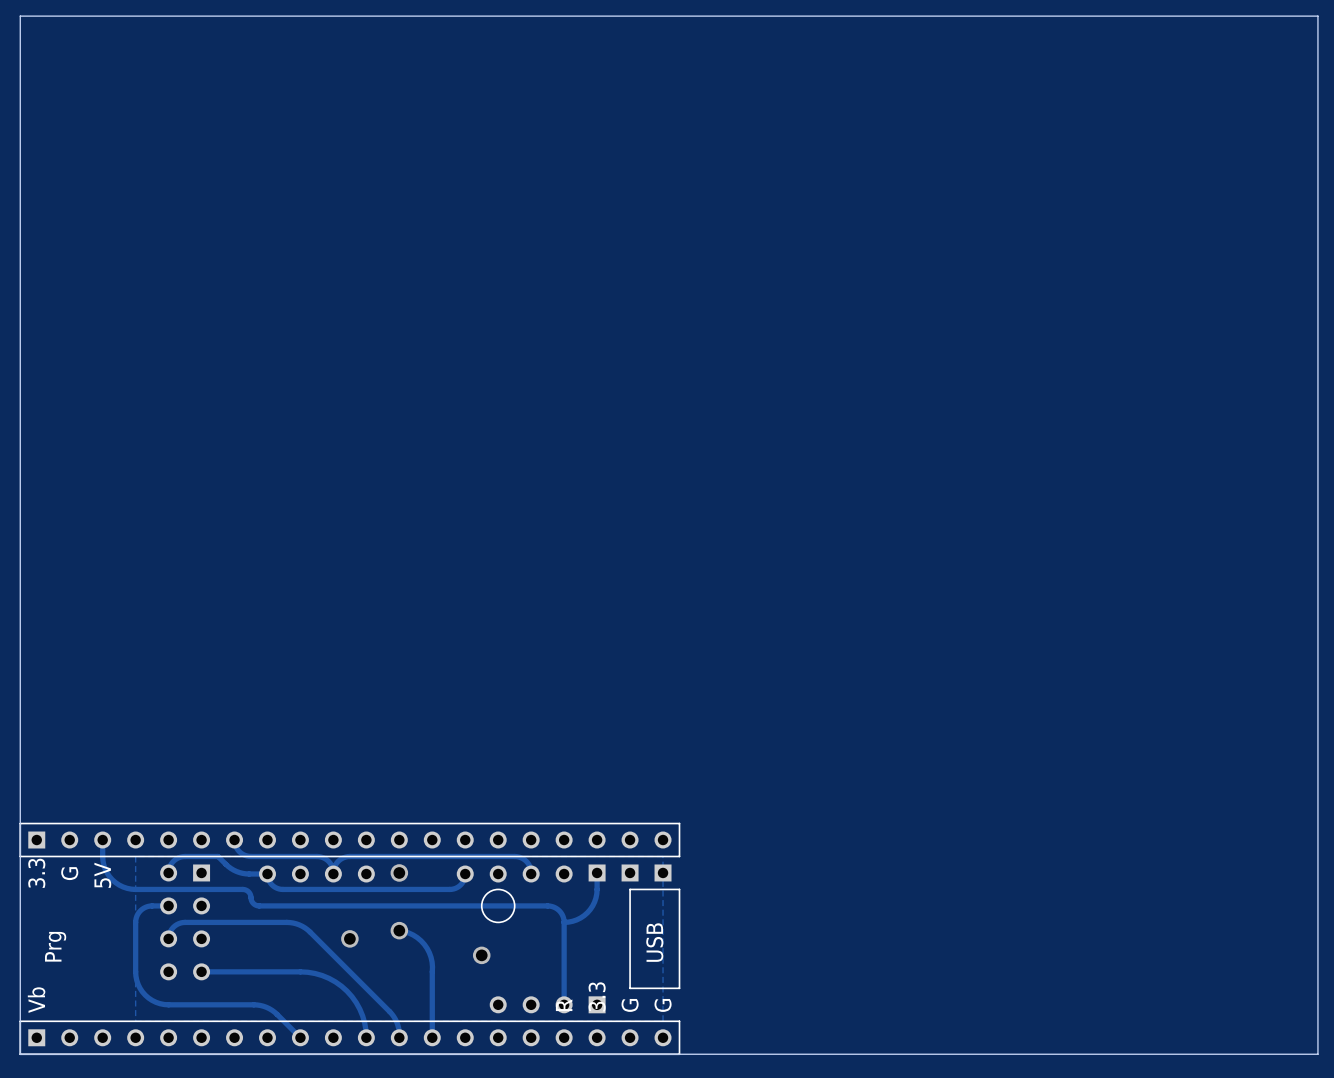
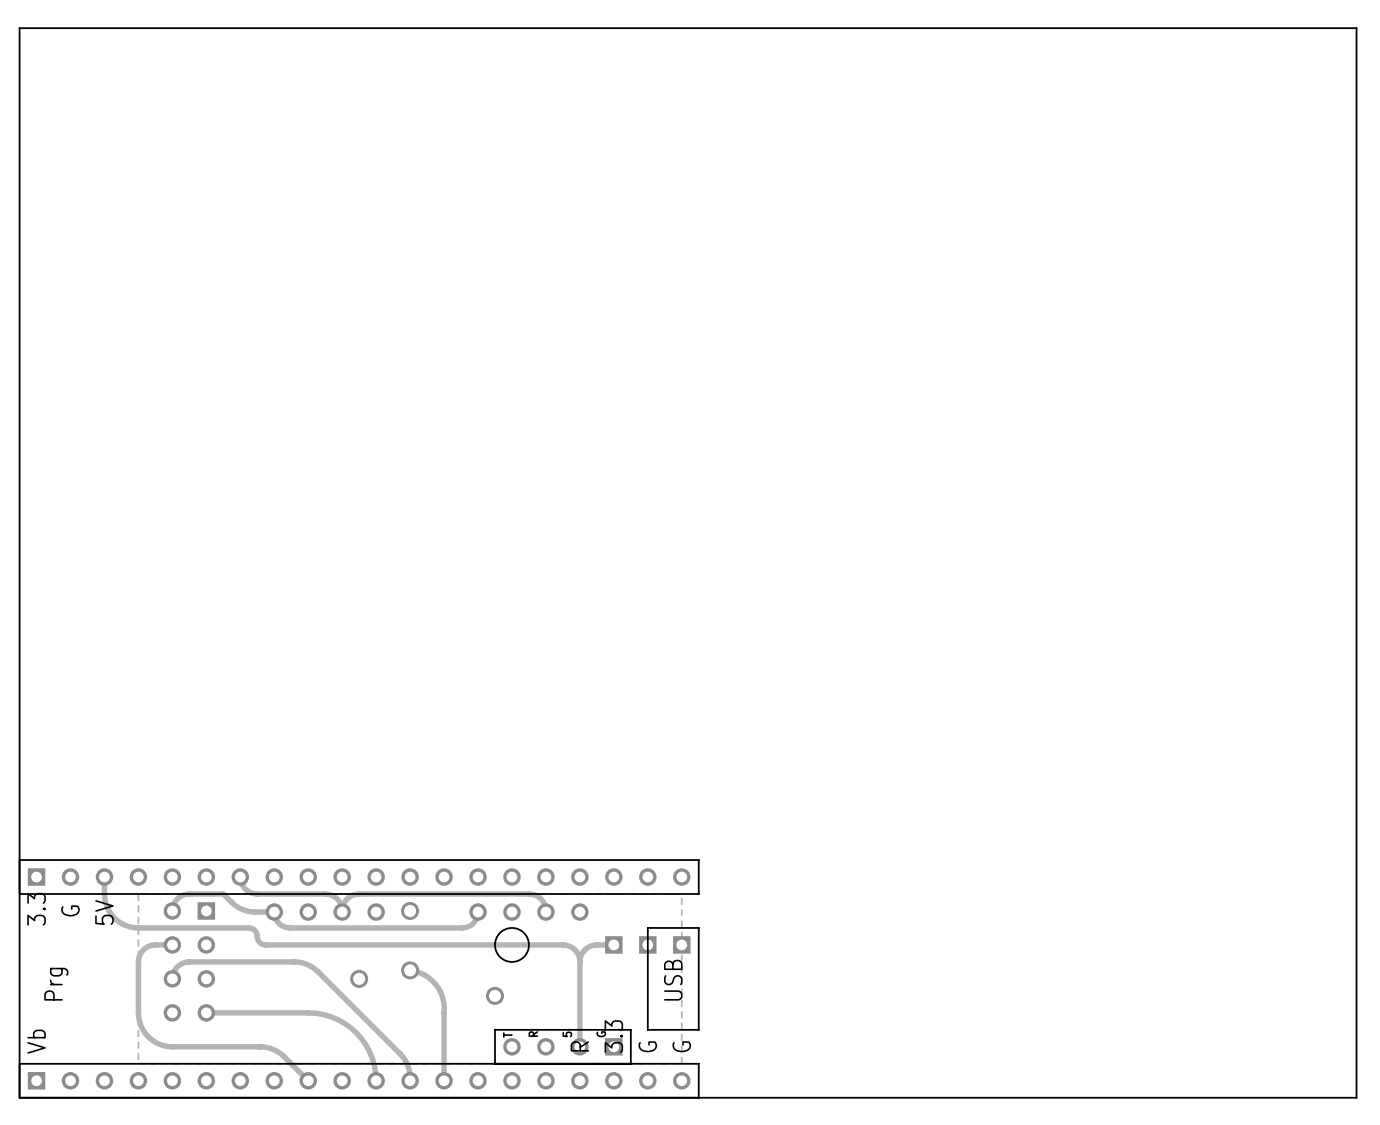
track: (597, 872) (596, 893) (594, 902) (590, 909) (580, 917) (564, 922) (559, 910) (547, 905) -> (613, 944) (594, 945) (588, 947) (582, 953) (579, 961) (574, 949) (562, 944)
part position: (630, 872) -> (647, 944)
part side: bottom (547, 1004) -> top (562, 1046)

